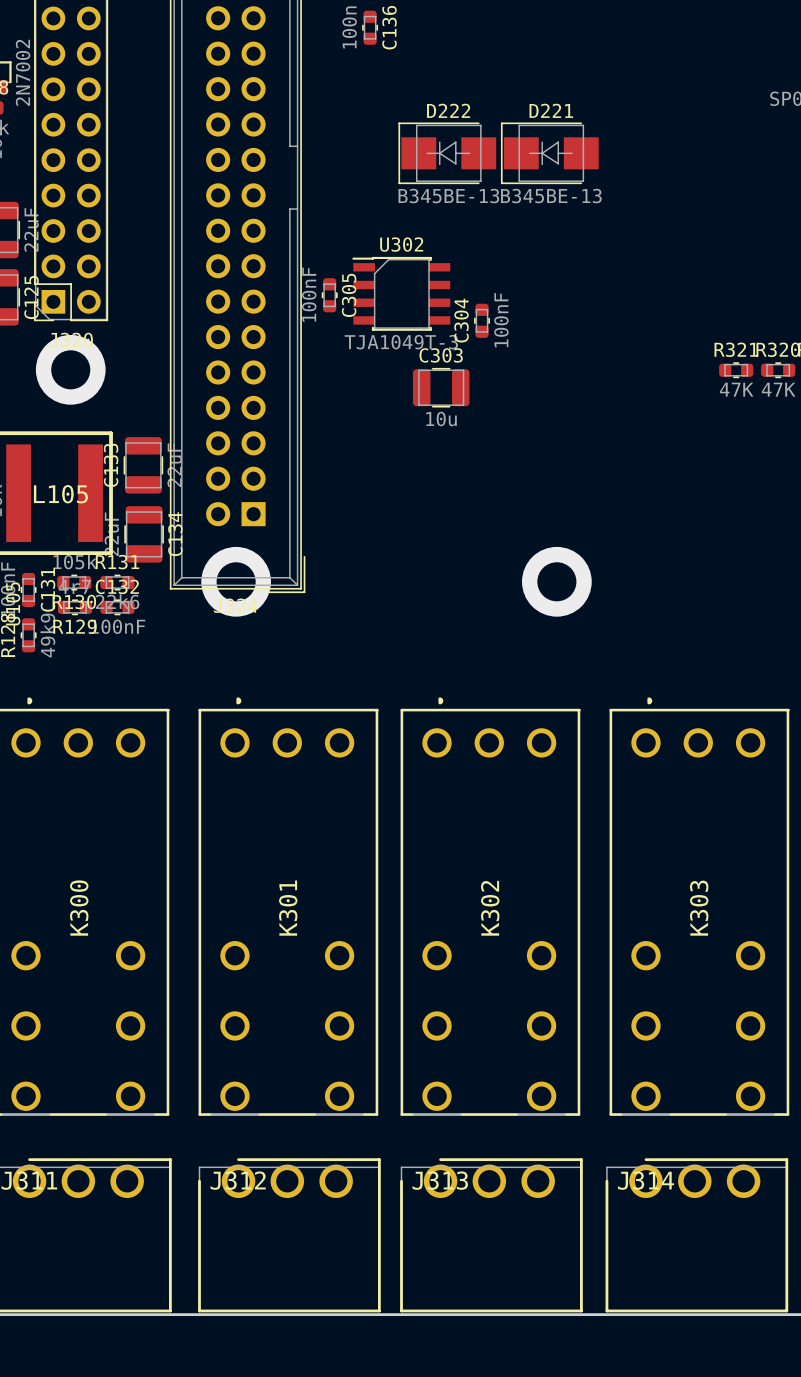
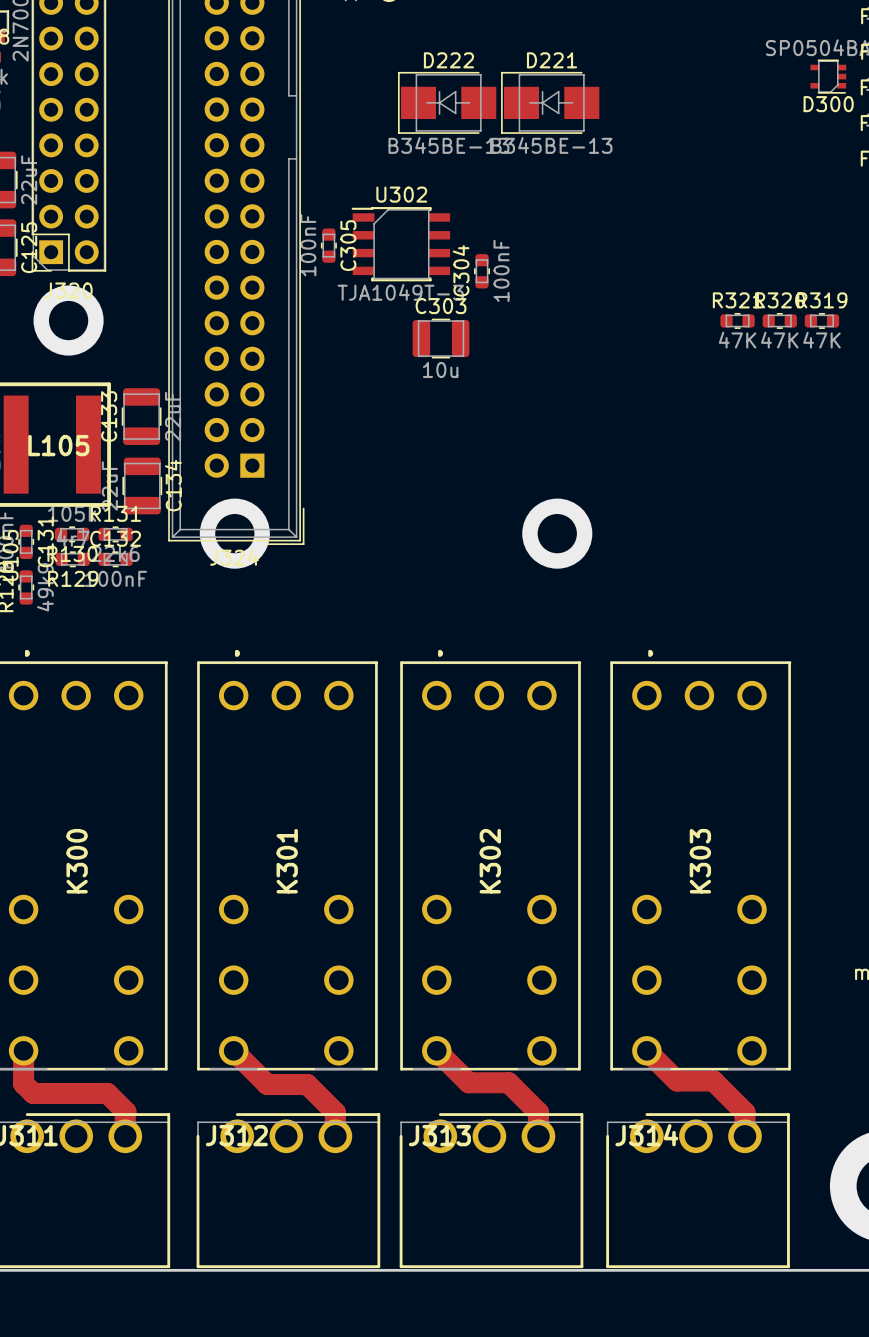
top track: none -> (23, 1050) (23, 1083) (33, 1093) (107, 1093) (125, 1111) (125, 1136)
top track: none -> (233, 1050) (267, 1084) (307, 1084) (335, 1112) (335, 1136)
top track: none -> (436, 1050) (468, 1082) (508, 1082) (538, 1112) (538, 1136)
top track: none -> (646, 1050) (677, 1080) (713, 1080) (744, 1112) (744, 1136)

